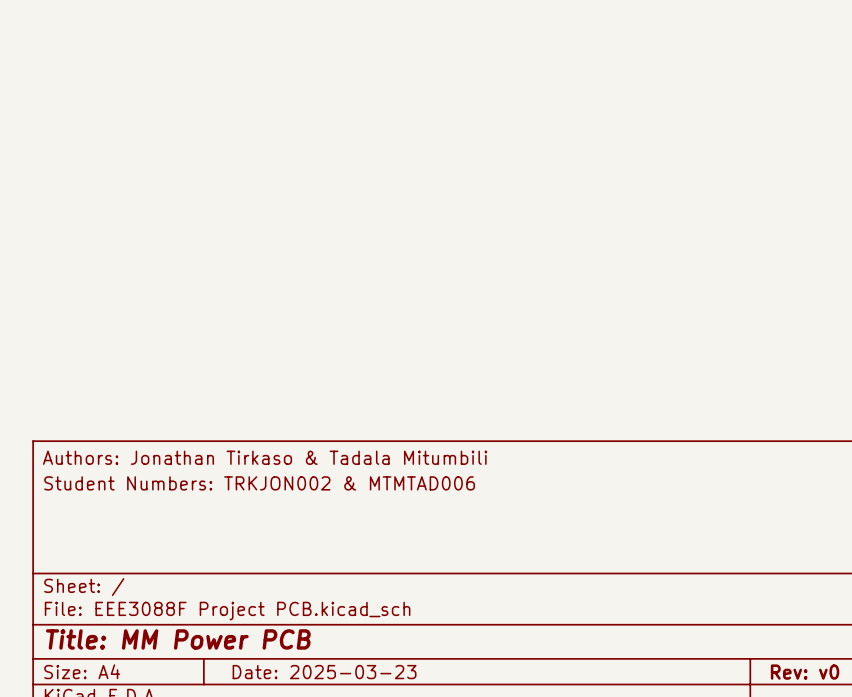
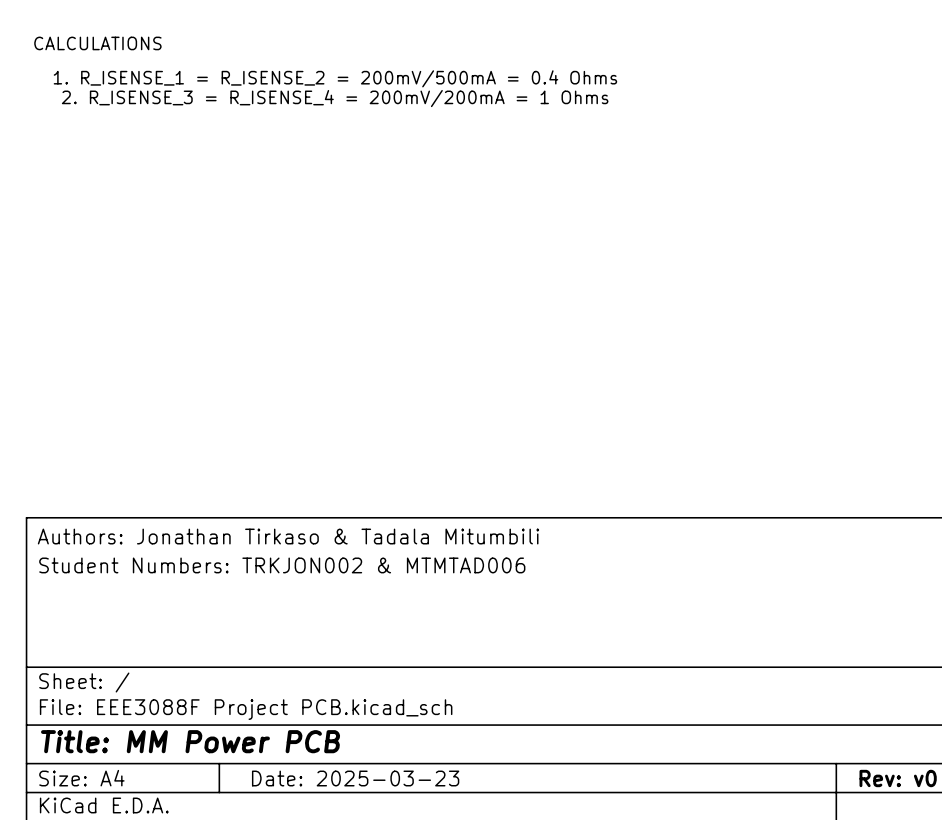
text: none -> CALCULATIONS (97, 43)
text: none -> 1. R_ISENSE_1 = R_ISENSE_2 = 200mV/500mA = 0.4 Ohms (335, 78)
text: none -> 2. R_ISENSE_3 = R_ISENSE_4 = 200mV/200mA = 1 Ohms (335, 98)

